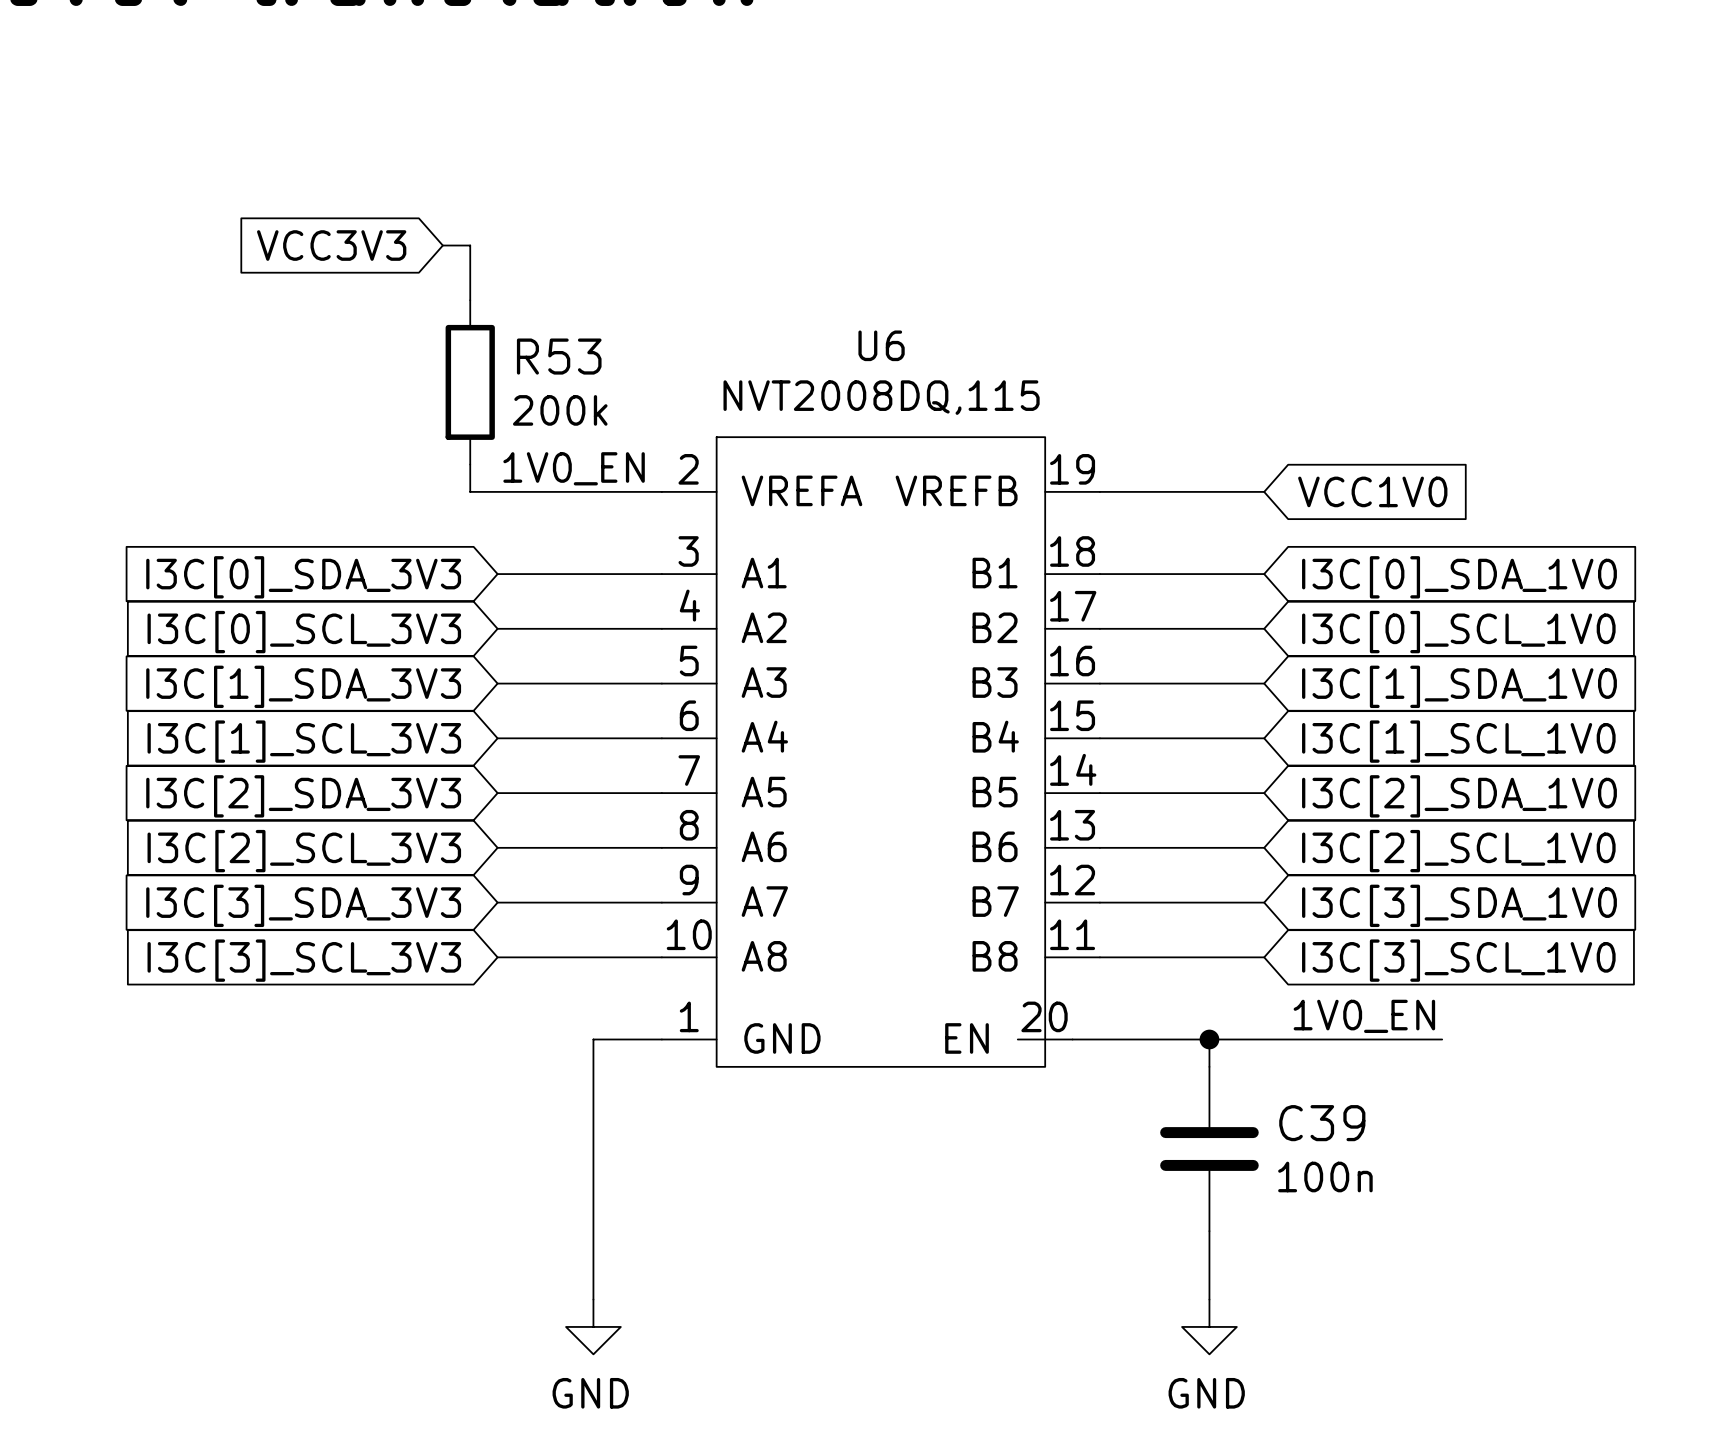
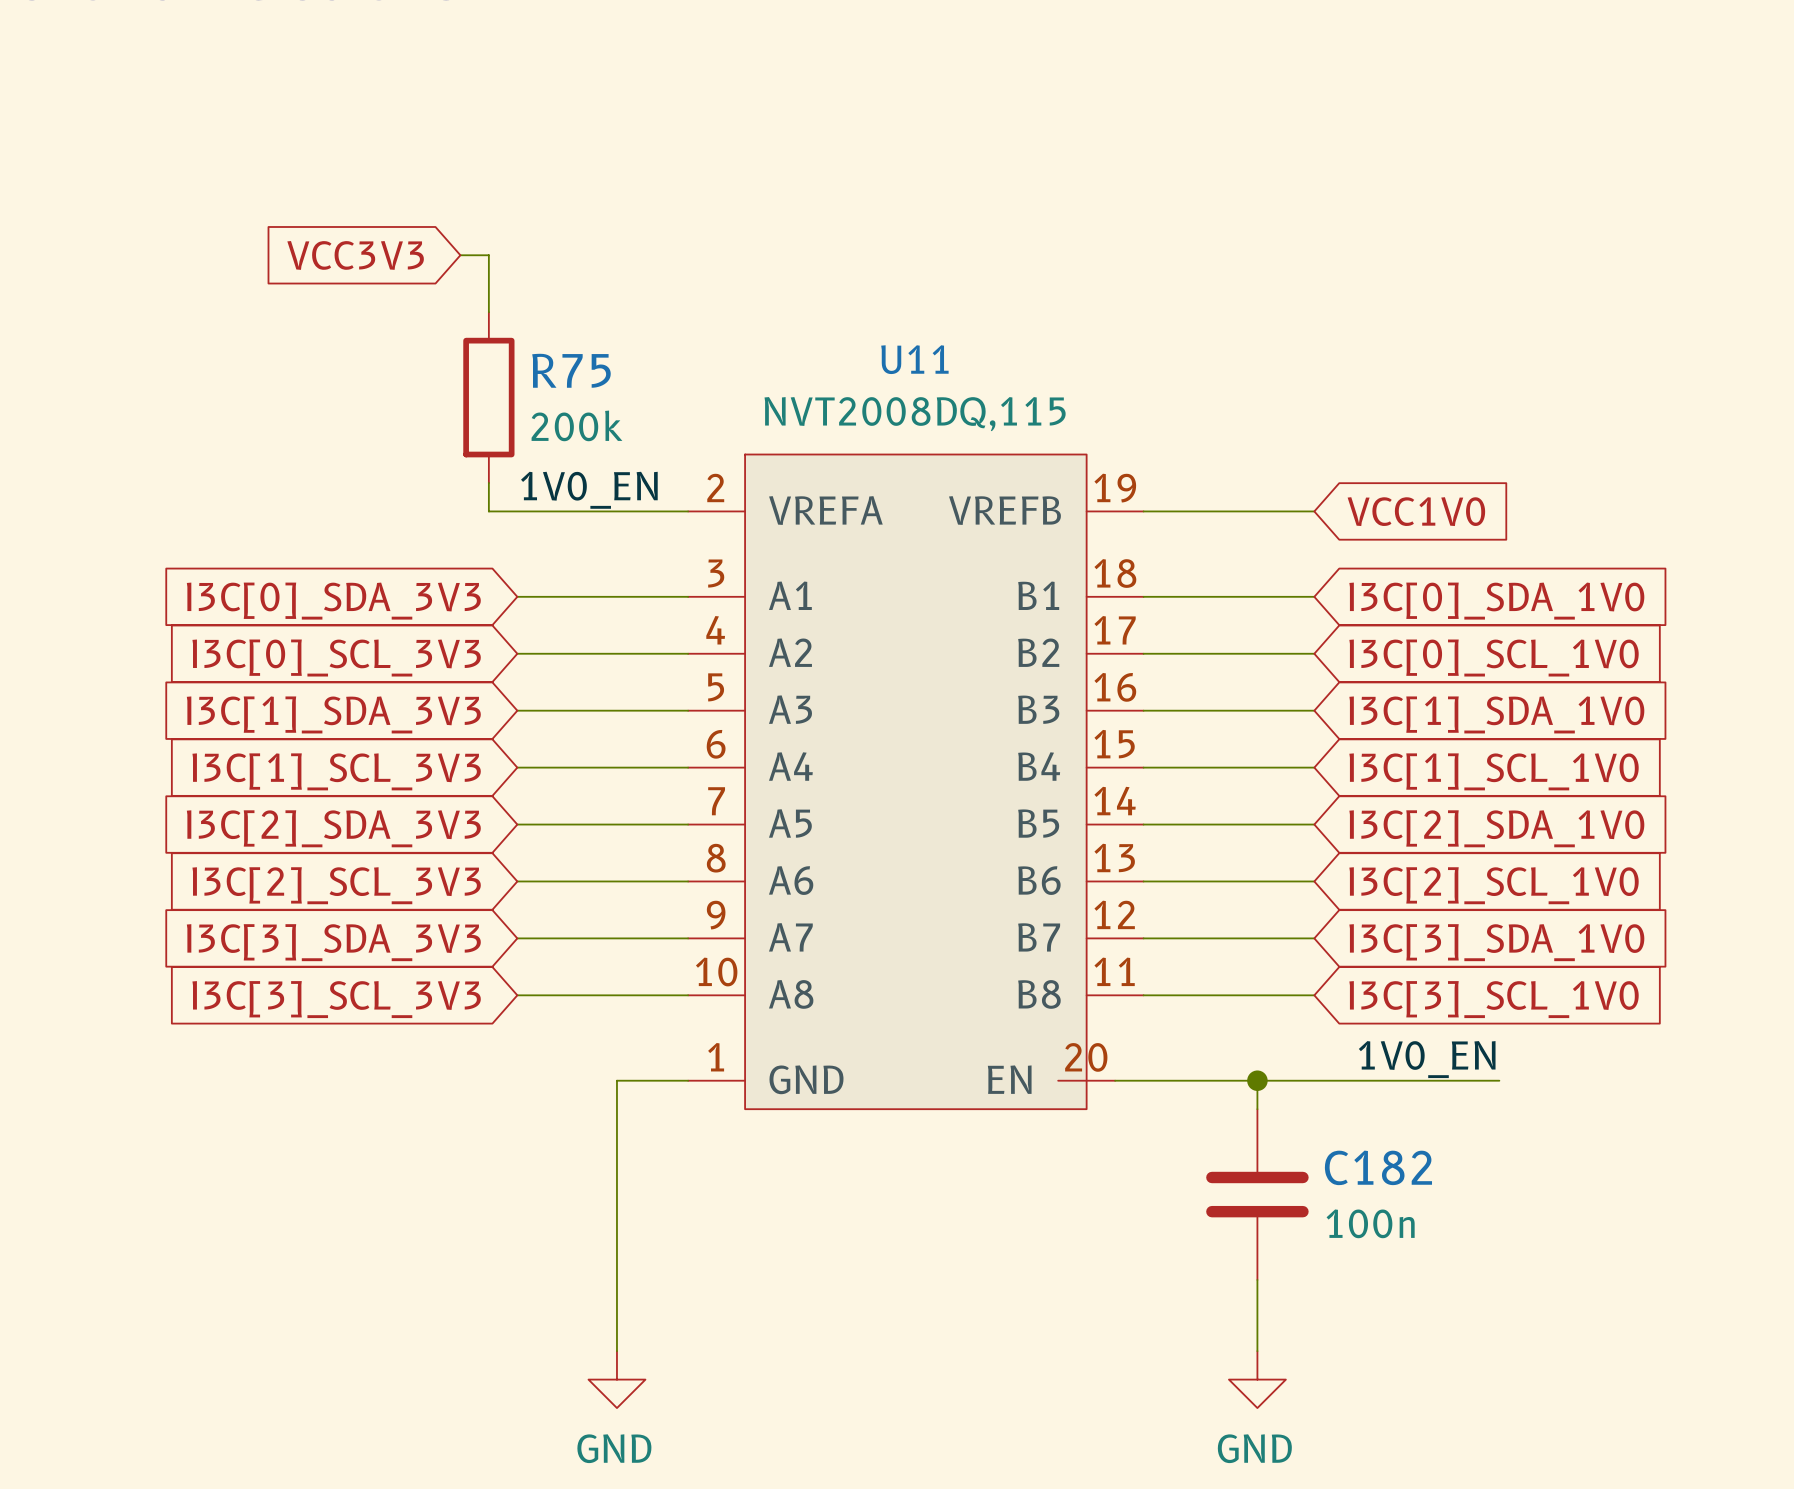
U6 name: U6 (881, 345) -> U11 (914, 359)
R53 name: R53 (559, 356) -> R75 (571, 370)
C39 name: C39 (1322, 1123) -> C182 (1378, 1167)

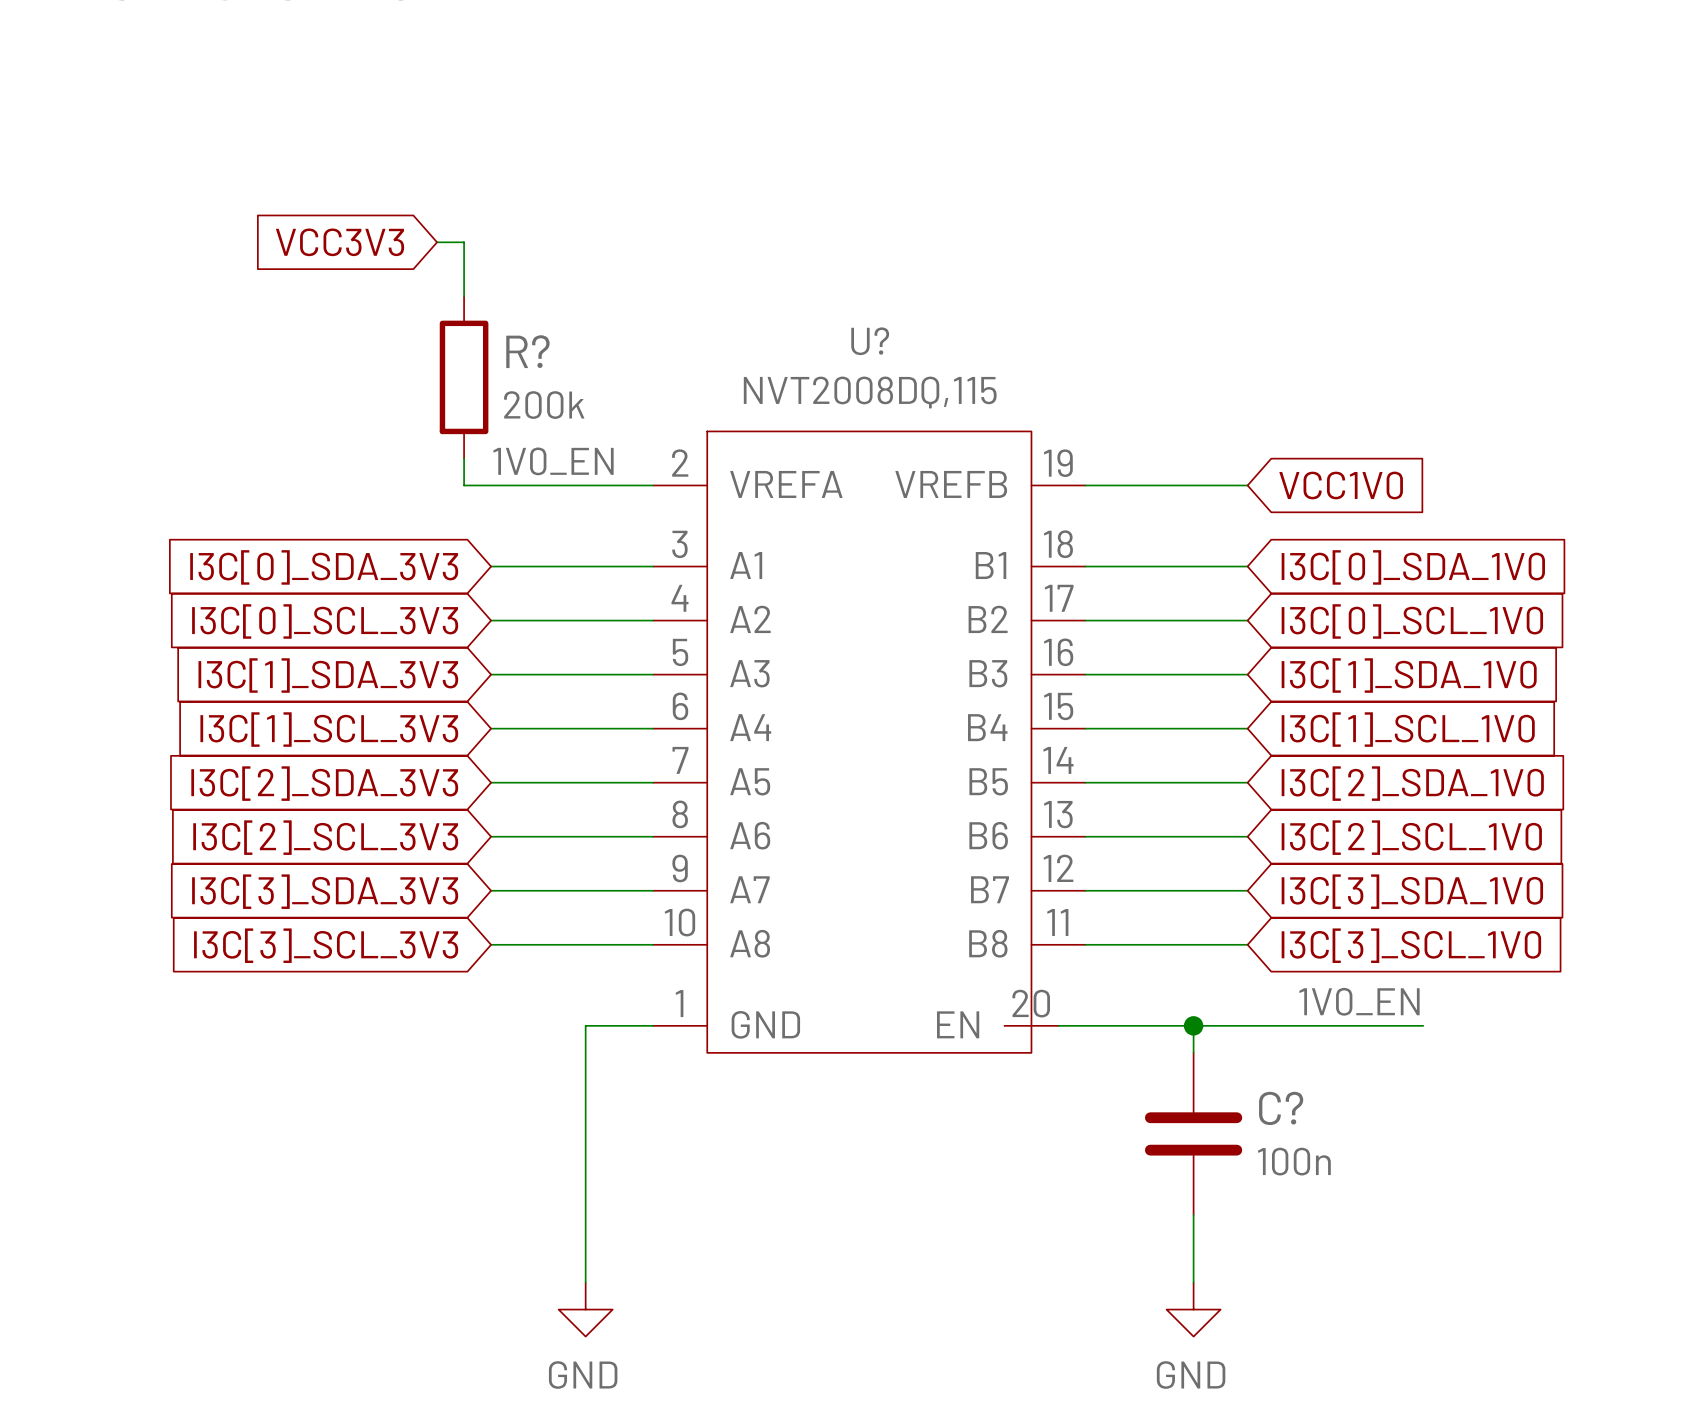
U11 name: U11 (914, 359) -> U? (870, 341)
R75 name: R75 (571, 370) -> R? (527, 351)
C182 name: C182 (1378, 1167) -> C? (1281, 1108)

